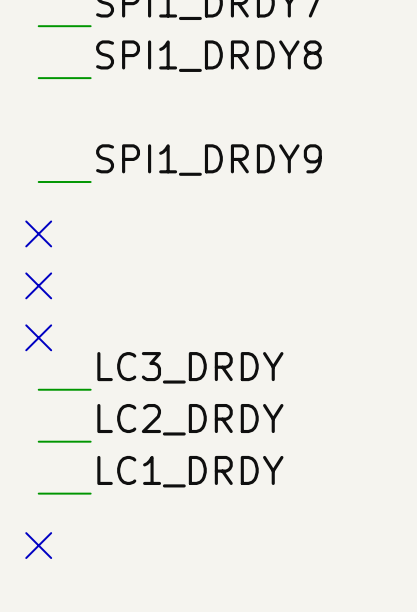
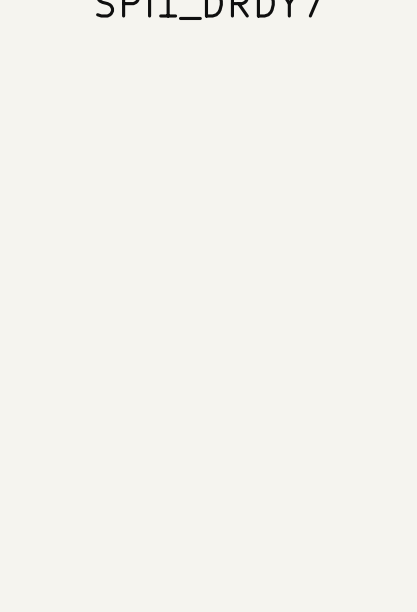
wire: (38, 26) (90, 26) -> none
label: SPI1_DRDY8 (208, 56) -> none
wire: (38, 78) (90, 78) -> none
label: SPI1_DRDY9 (208, 160) -> none
wire: (38, 181) (90, 181) -> none
no-connect mark: (38, 233) -> none
no-connect mark: (38, 285) -> none
no-connect mark: (38, 337) -> none
label: LC3_DRDY (190, 367) -> none
wire: (38, 389) (90, 389) -> none
label: LC2_DRDY (190, 419) -> none
wire: (38, 441) (90, 441) -> none
label: LC1_DRDY (190, 471) -> none
wire: (38, 493) (90, 493) -> none
no-connect mark: (38, 545) -> none

